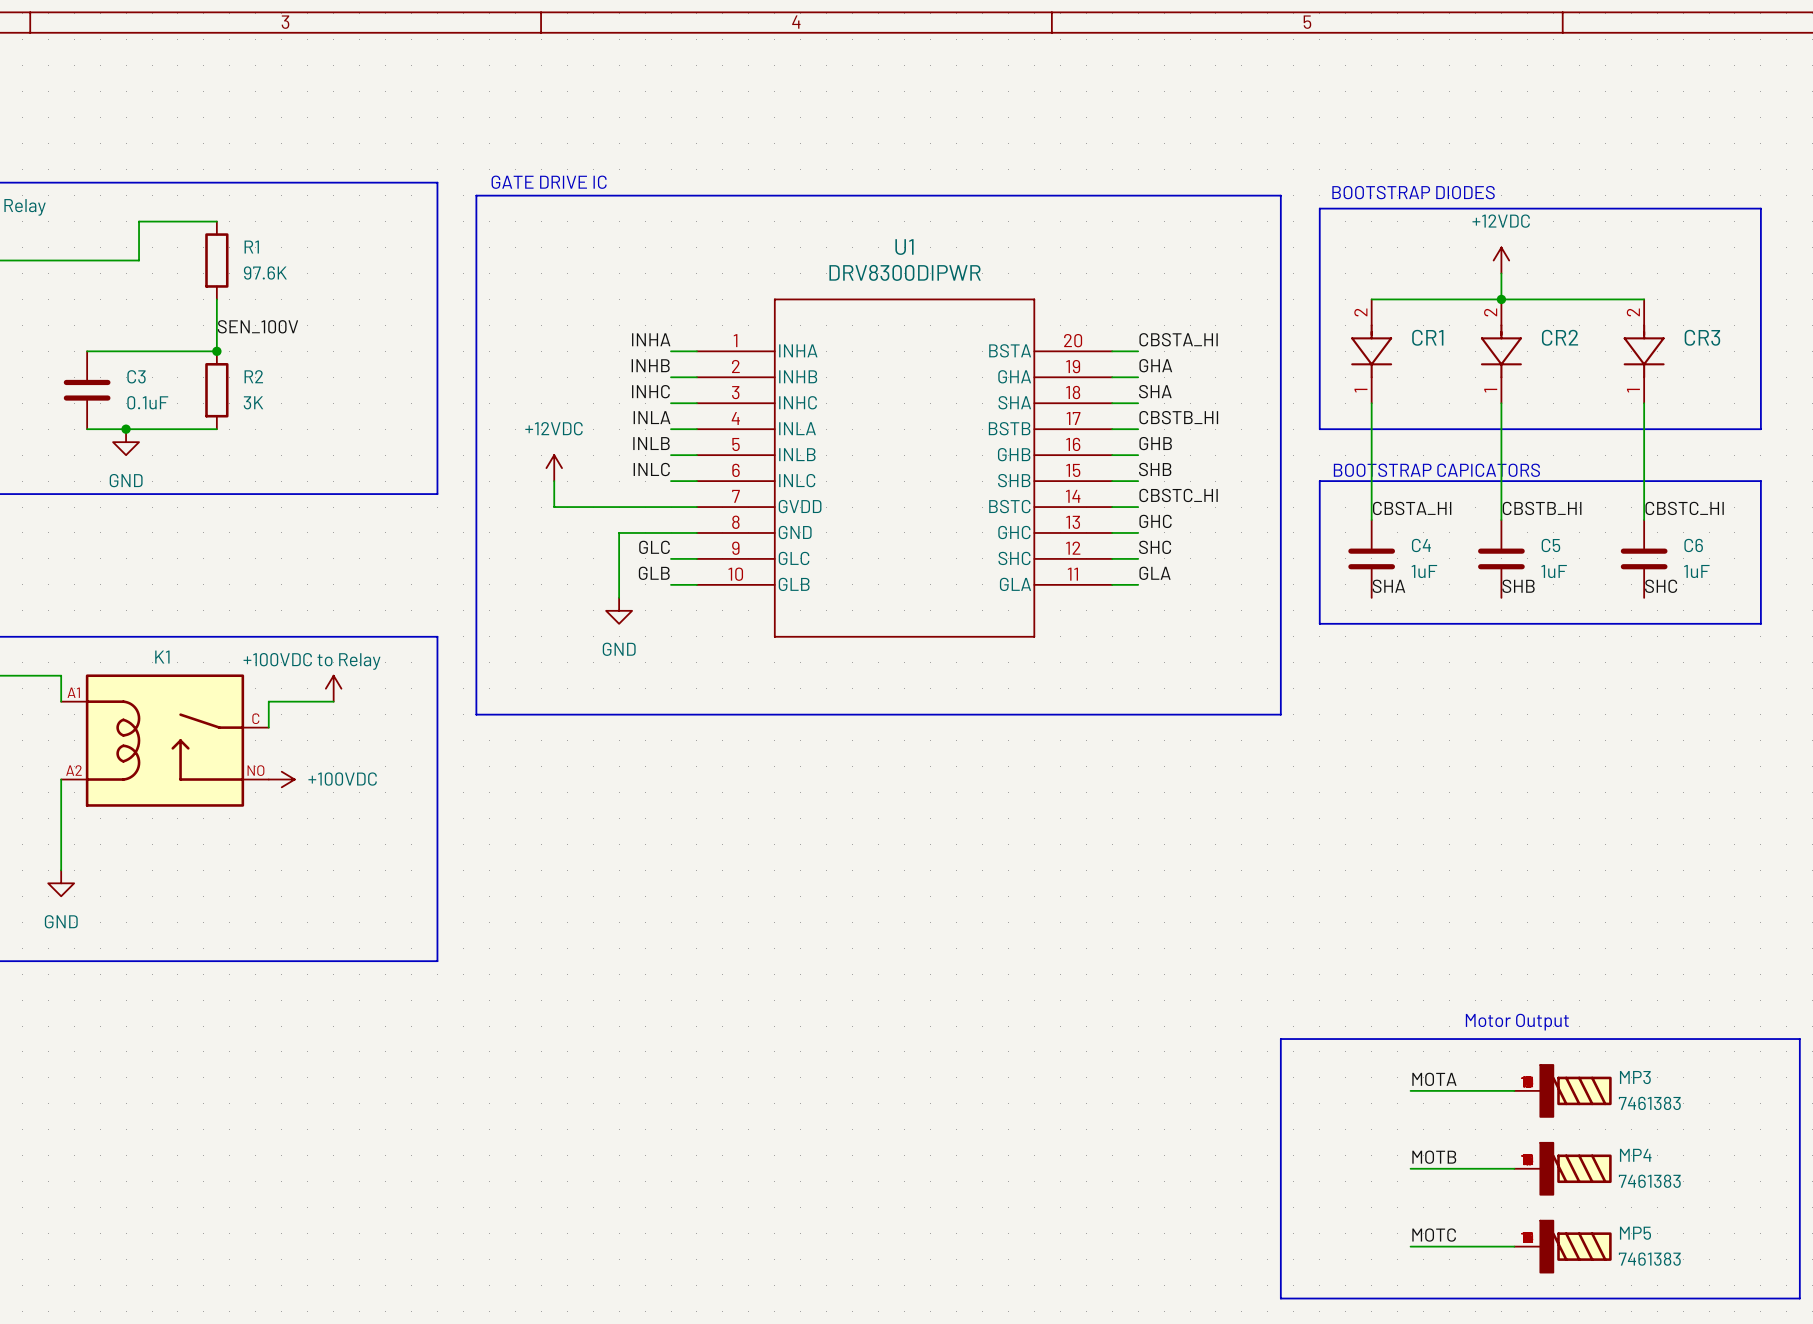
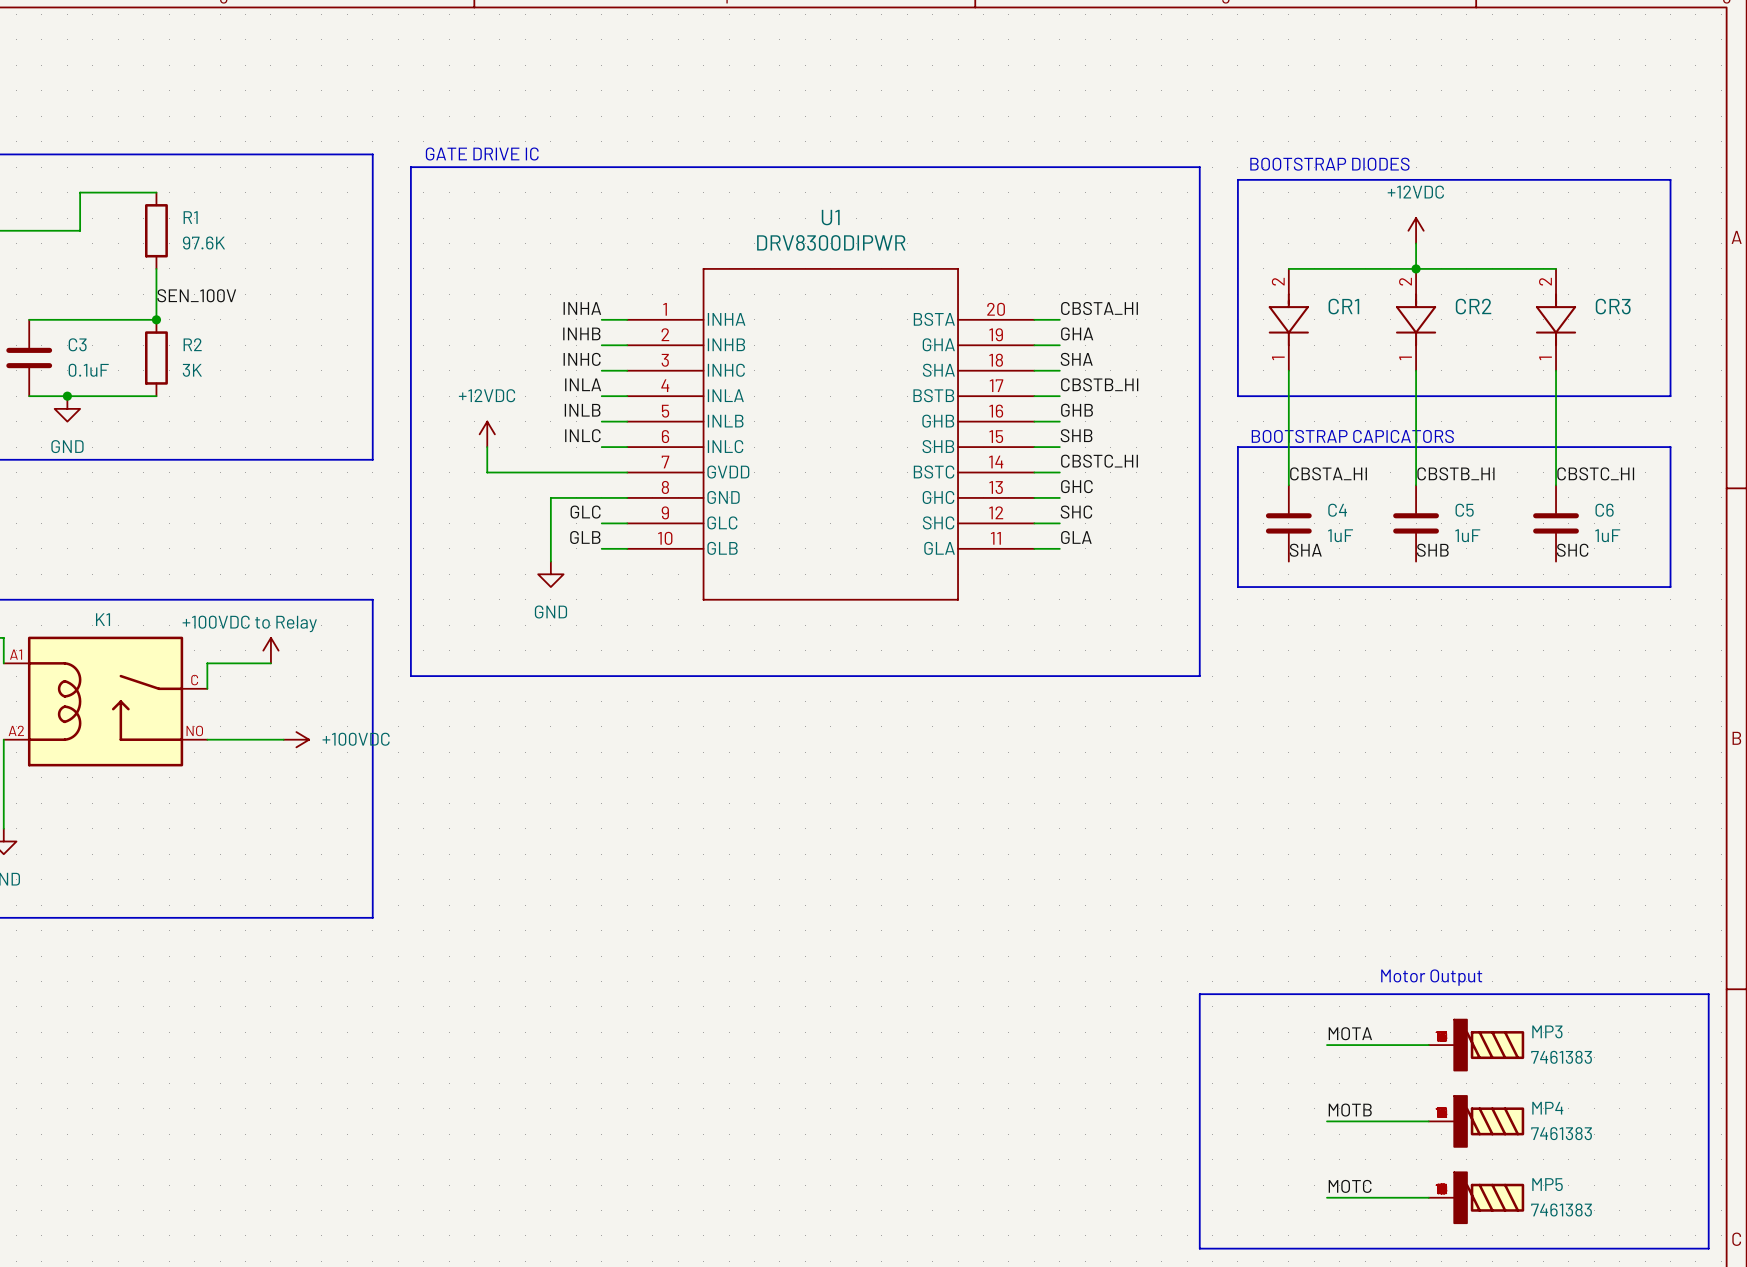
wire: none -> (207, 739) (283, 739)
power symbol position: +100VDC (281, 779) -> +100VDC (296, 739)

